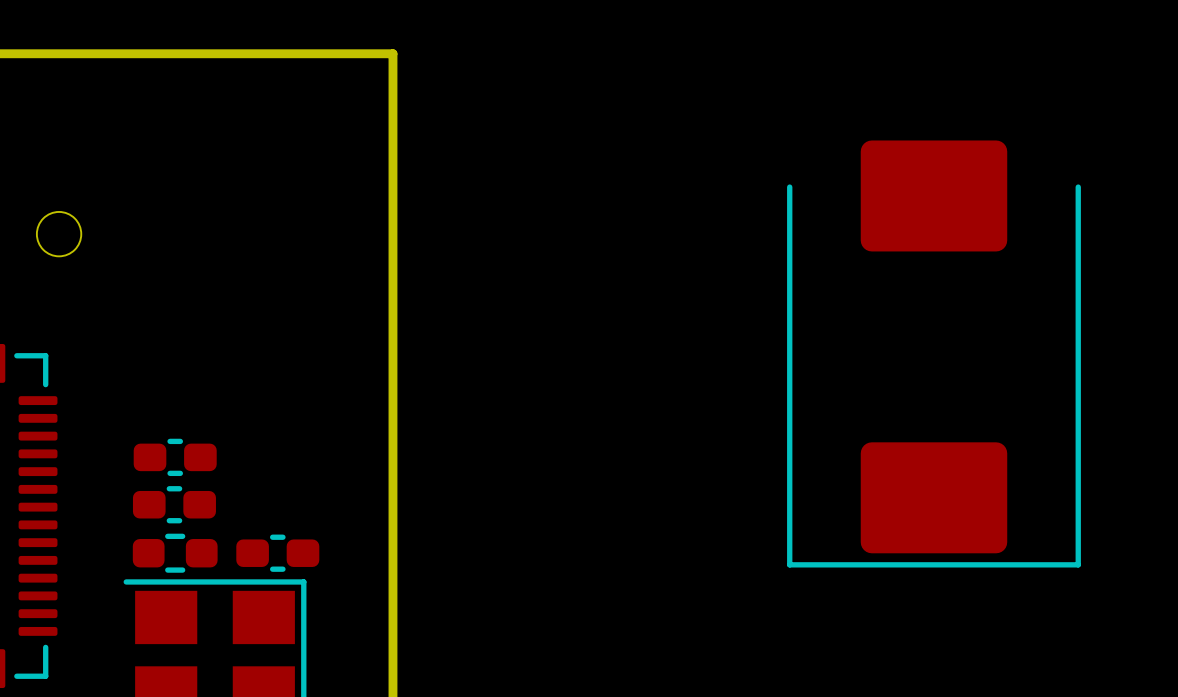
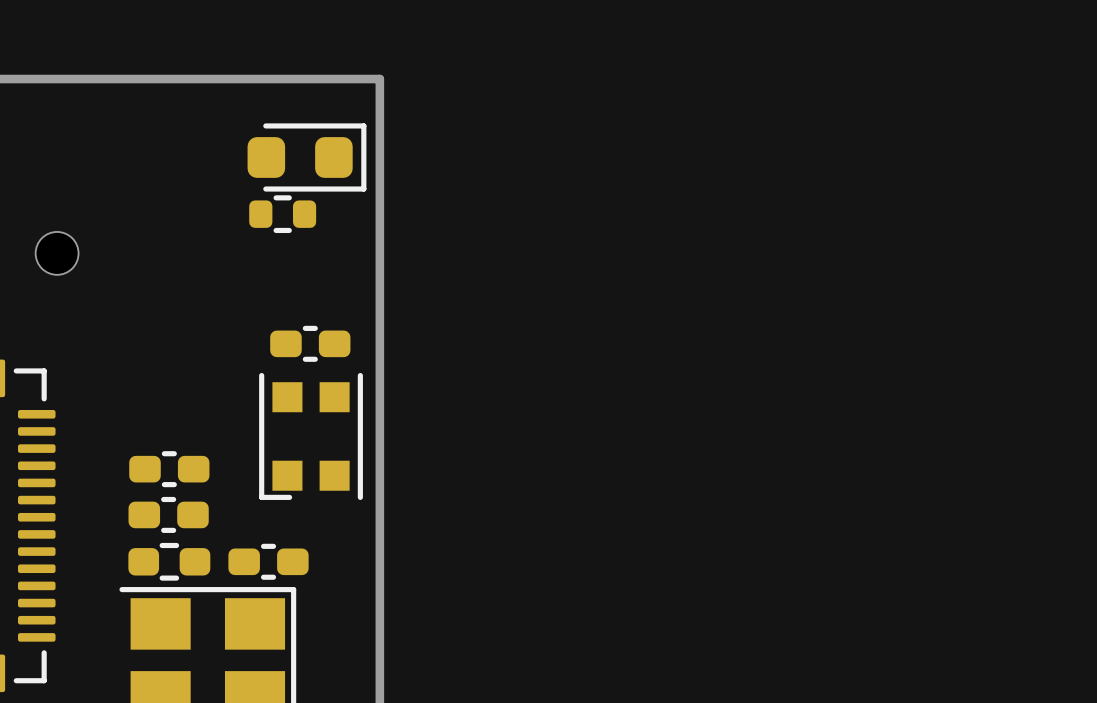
part: none -> (306, 157)
part: none -> (282, 214)
part: none -> (310, 343)
part: (933, 353) -> none
part: none -> (311, 436)

